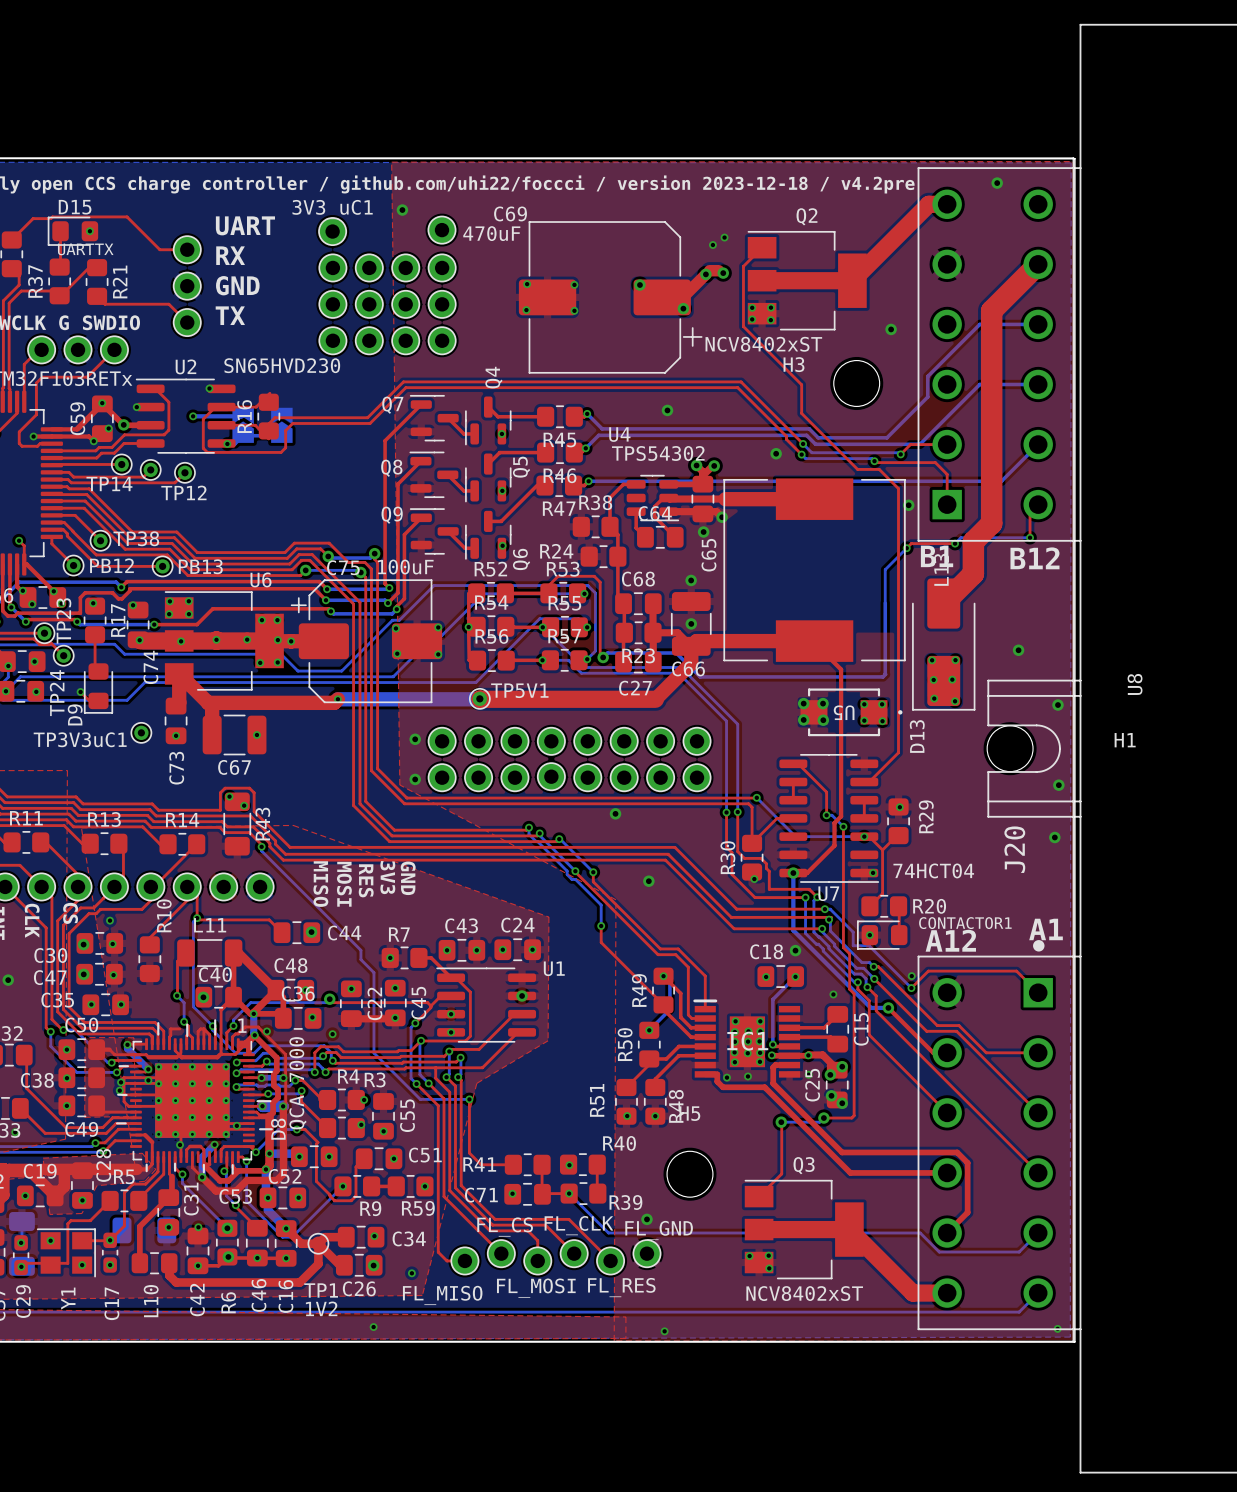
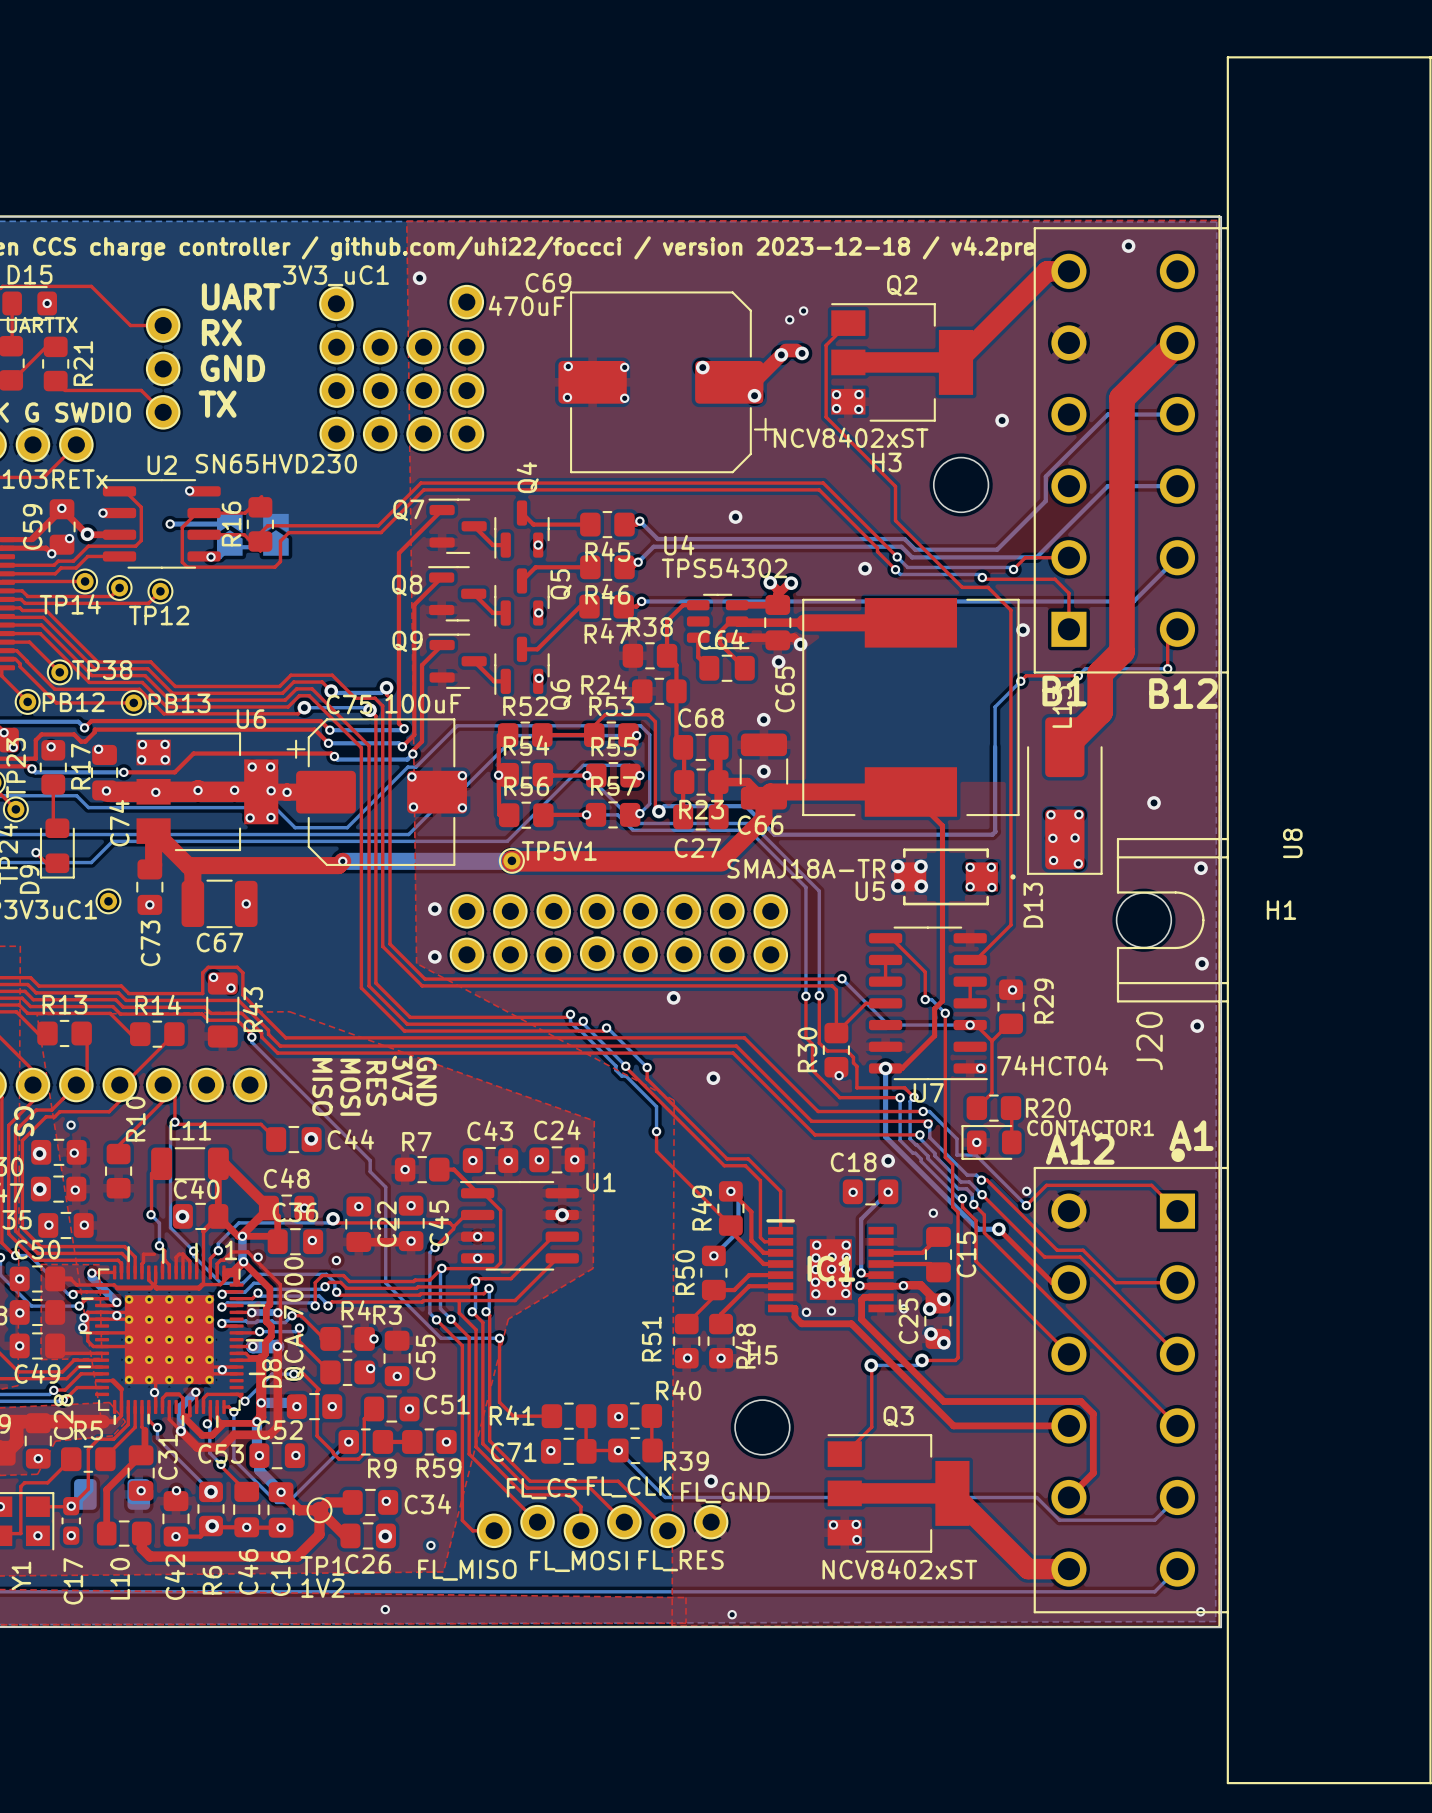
U5 value: none -> SMAJ18A-TR (806, 868)
U5 name rotation: 0° (844, 712) -> 180° (870, 891)
U5 name position: U5 (844, 712) -> U5 (870, 891)

